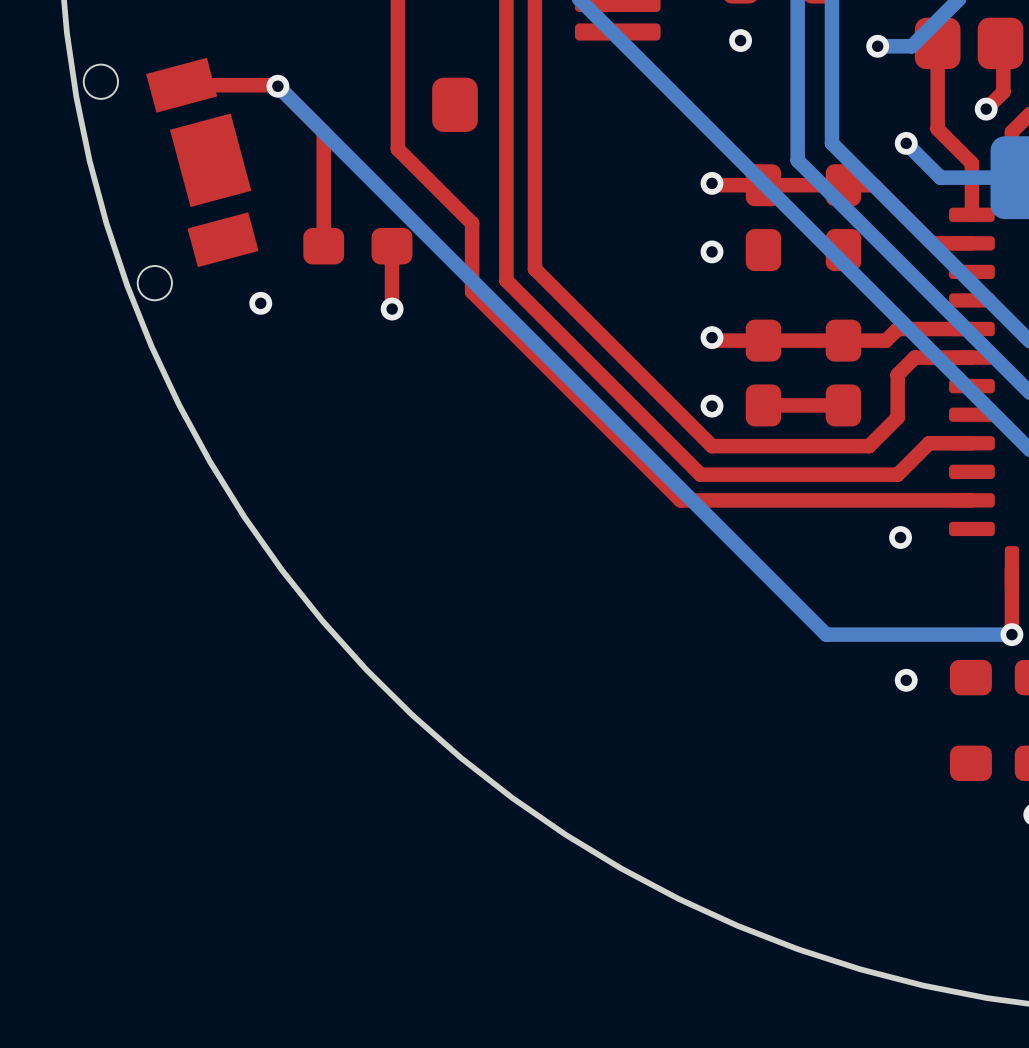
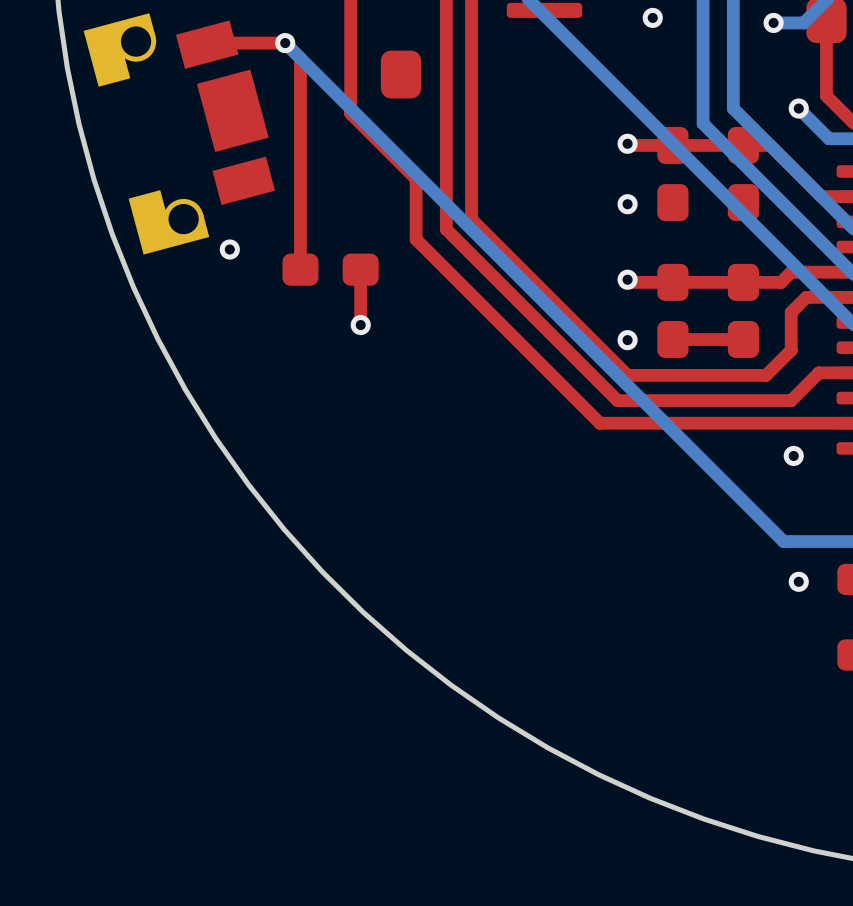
part footprint: [83, 57, 259, 301] -> [83, 13, 276, 255]
top track: none -> (195, 47) (199, 43) (285, 43) (300, 58) (300, 269)
top track: (181, 85) (276, 85) (323, 132) (323, 246) -> none
bottom track: (277, 86) (826, 634) (889, 634) -> (285, 43) (783, 541)
via position: (277, 86) -> (285, 43)
part position: (357, 246) -> (330, 269)
top track: (391, 246) (391, 308) -> (360, 269) (360, 324)
via position: (392, 309) -> (360, 325)

